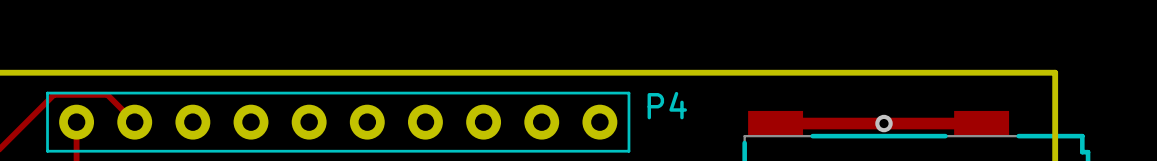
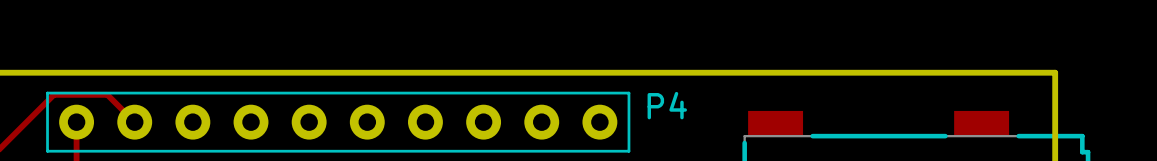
track: (775, 123) (988, 123) -> none
via: (884, 123) -> none

